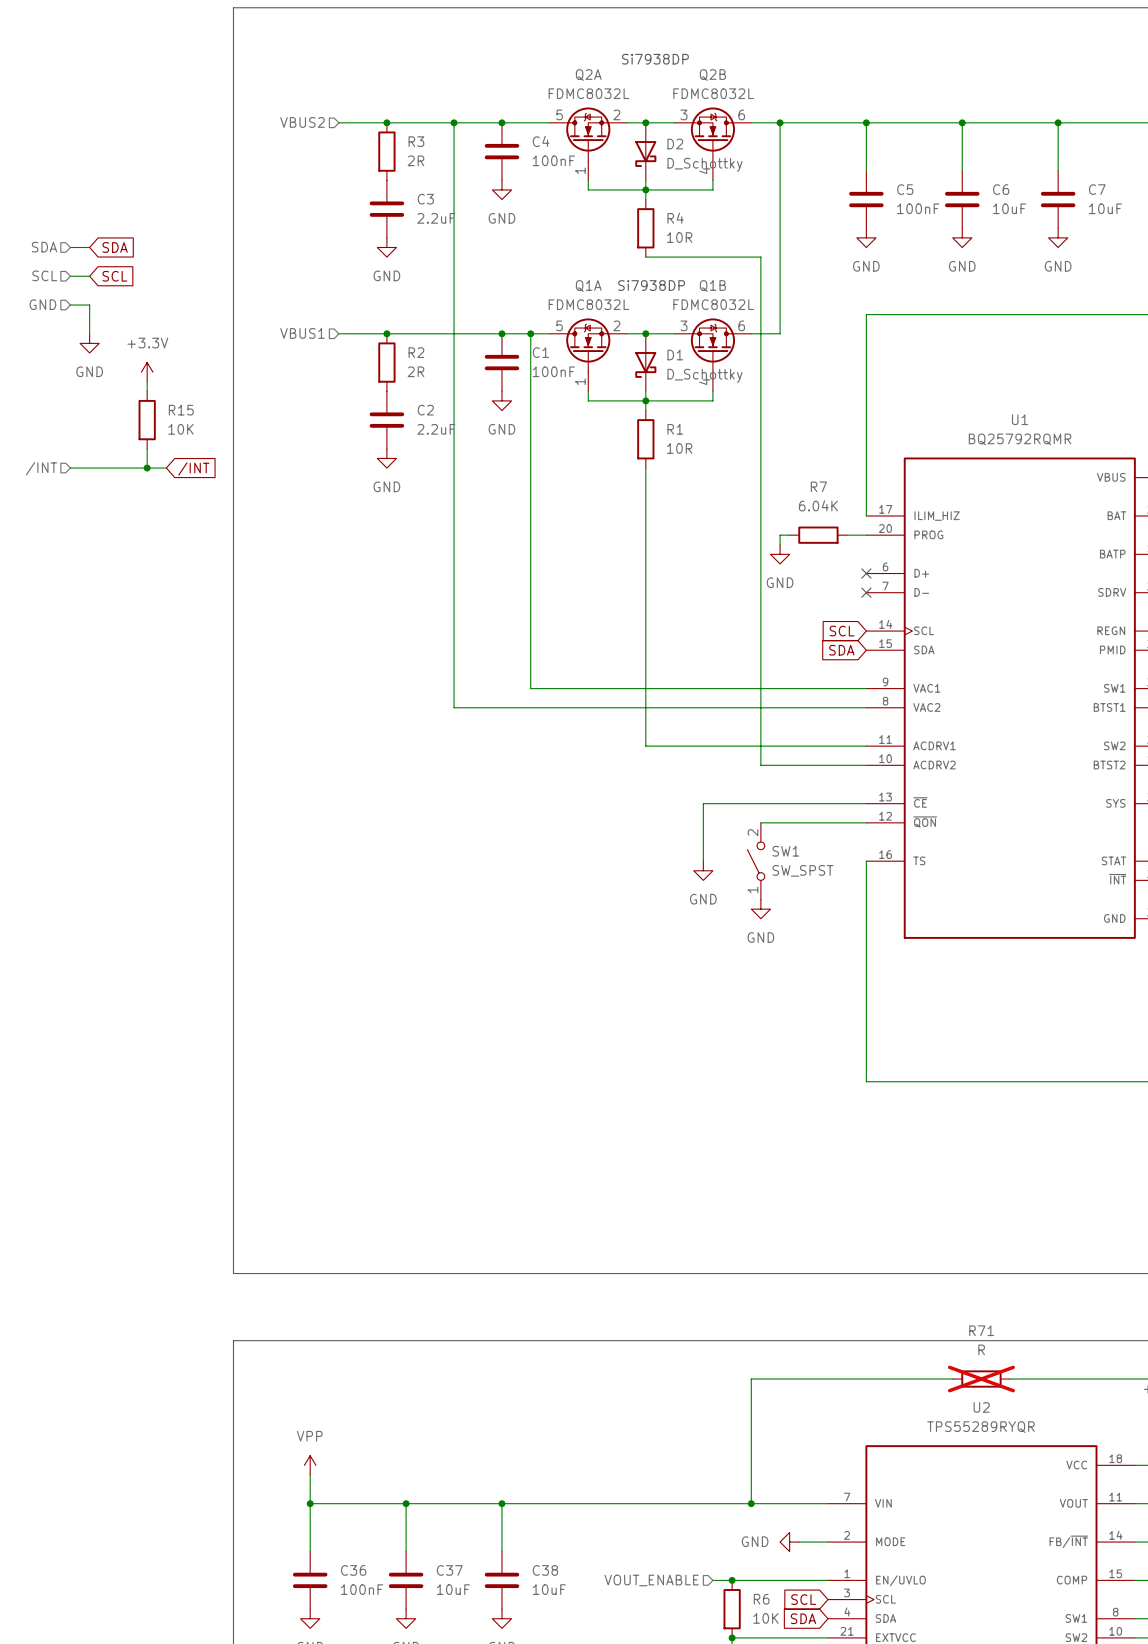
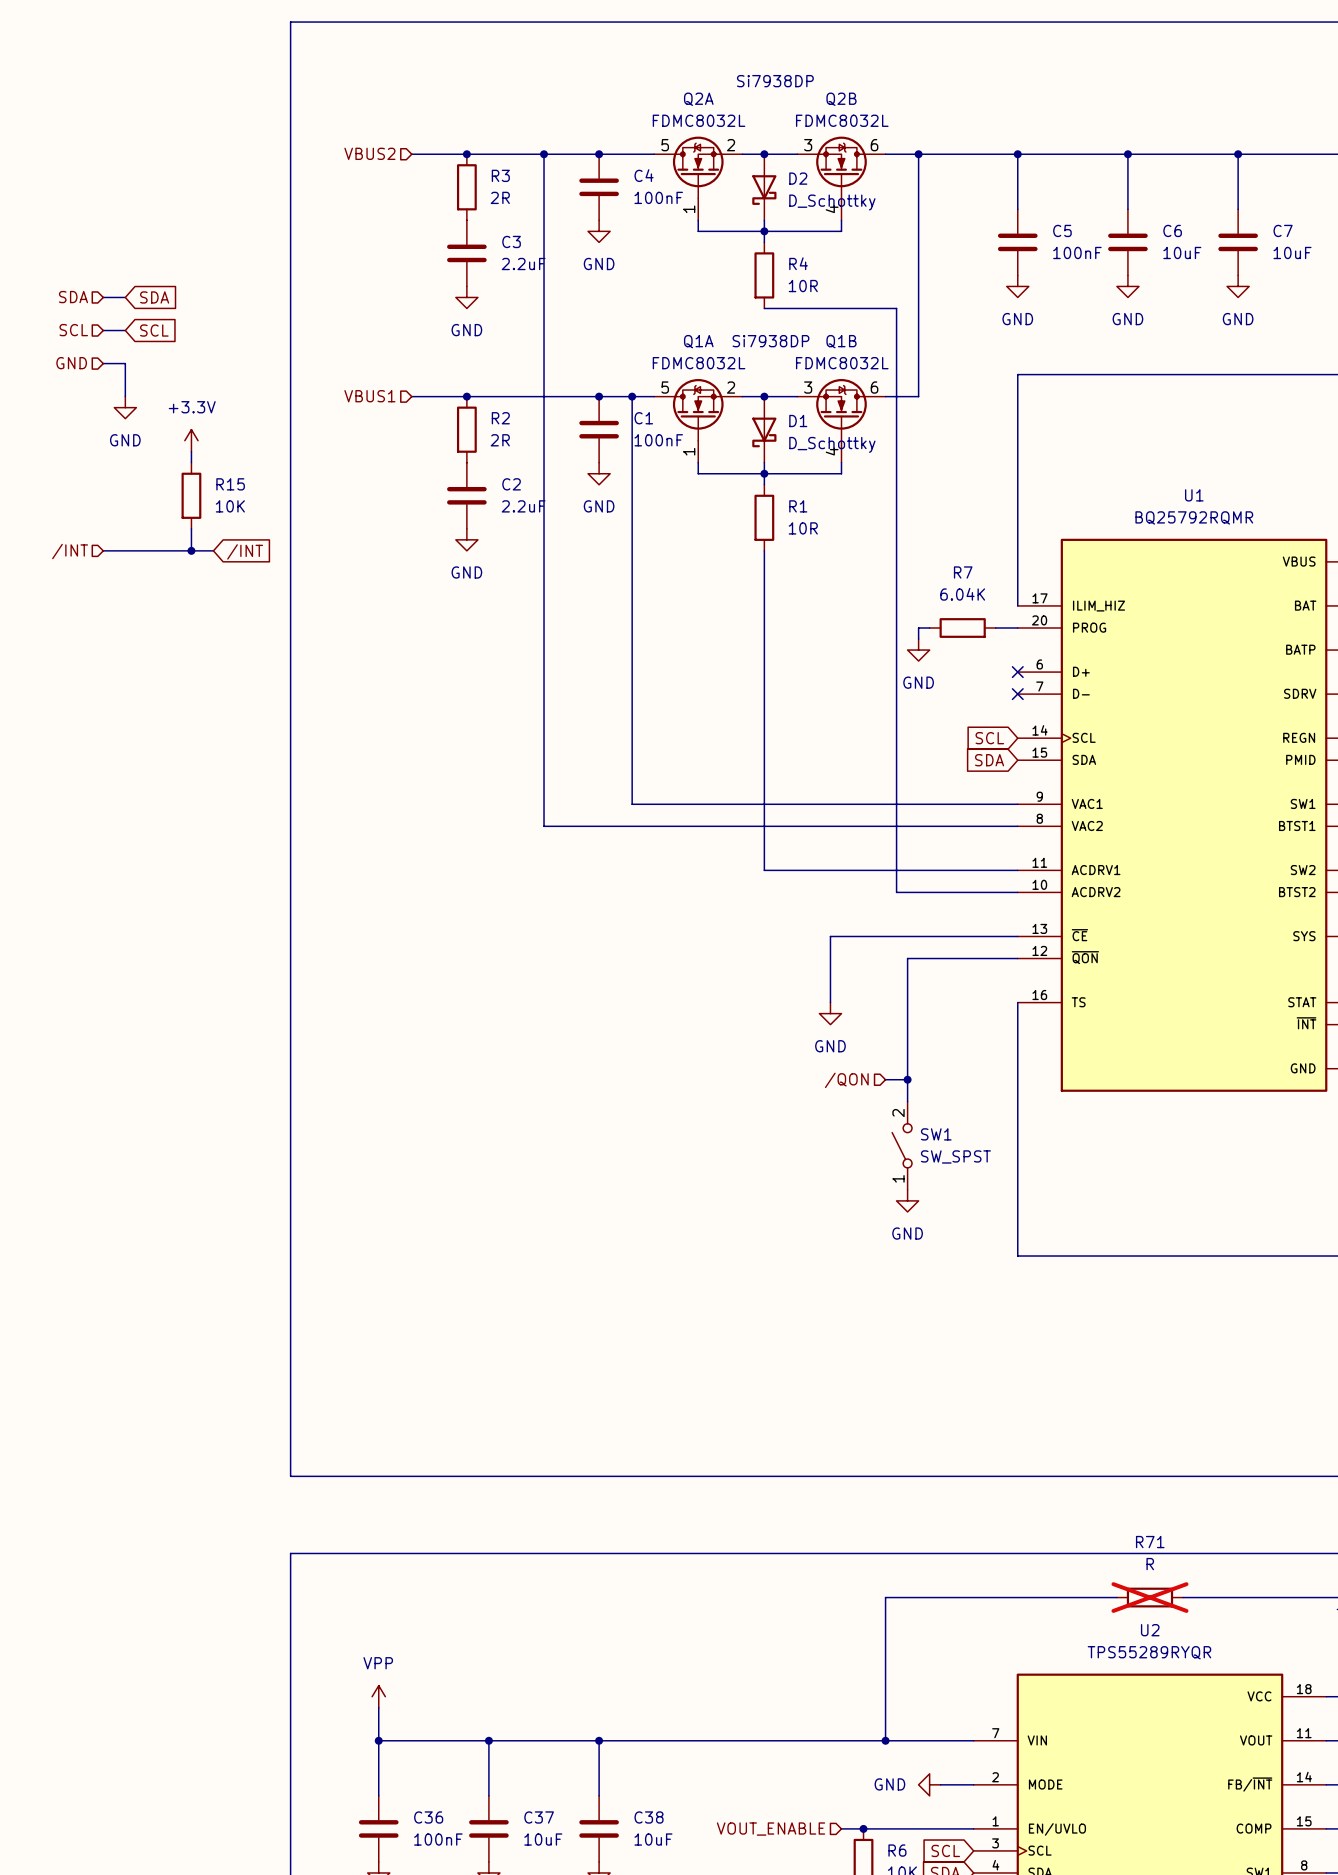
wire: (760, 822) (770, 822) -> (907, 1101) (907, 958)
SW1 position: (756, 861) -> (902, 1145)
power symbol position: GND (760, 909) -> GND (907, 1200)
hierarchical label: none -> /QON (846, 1080)
wire: none -> (885, 1079) (907, 1079)
junction: none -> (907, 1079)

